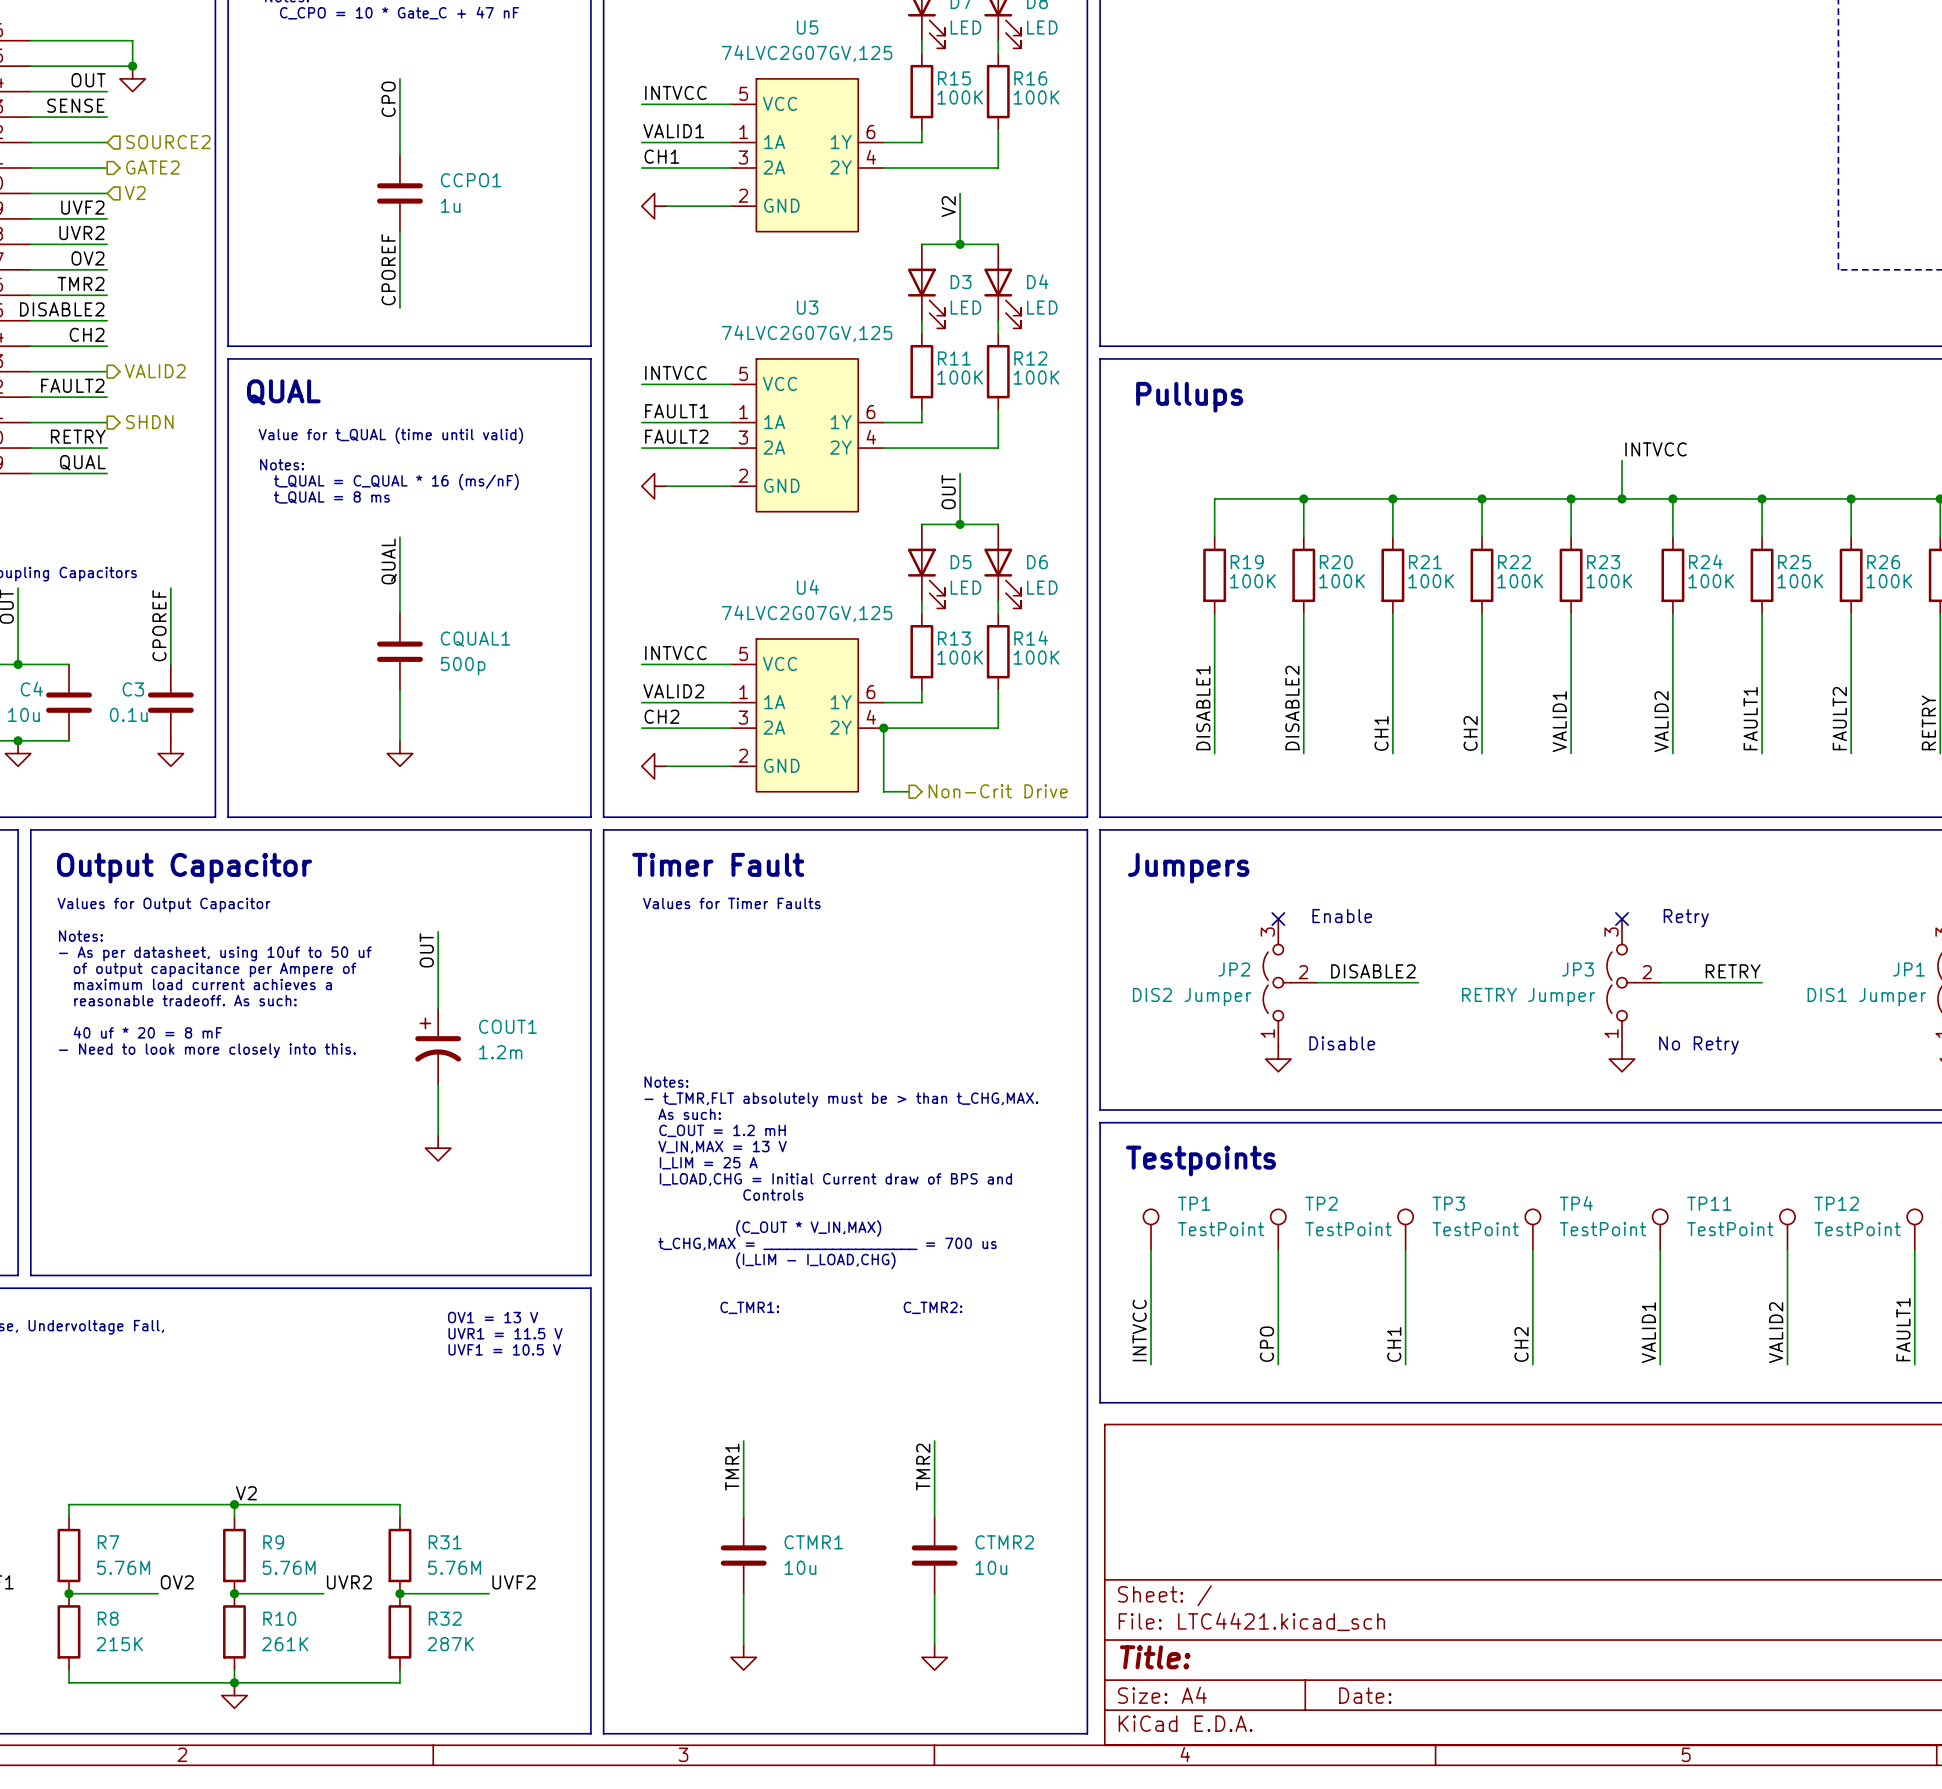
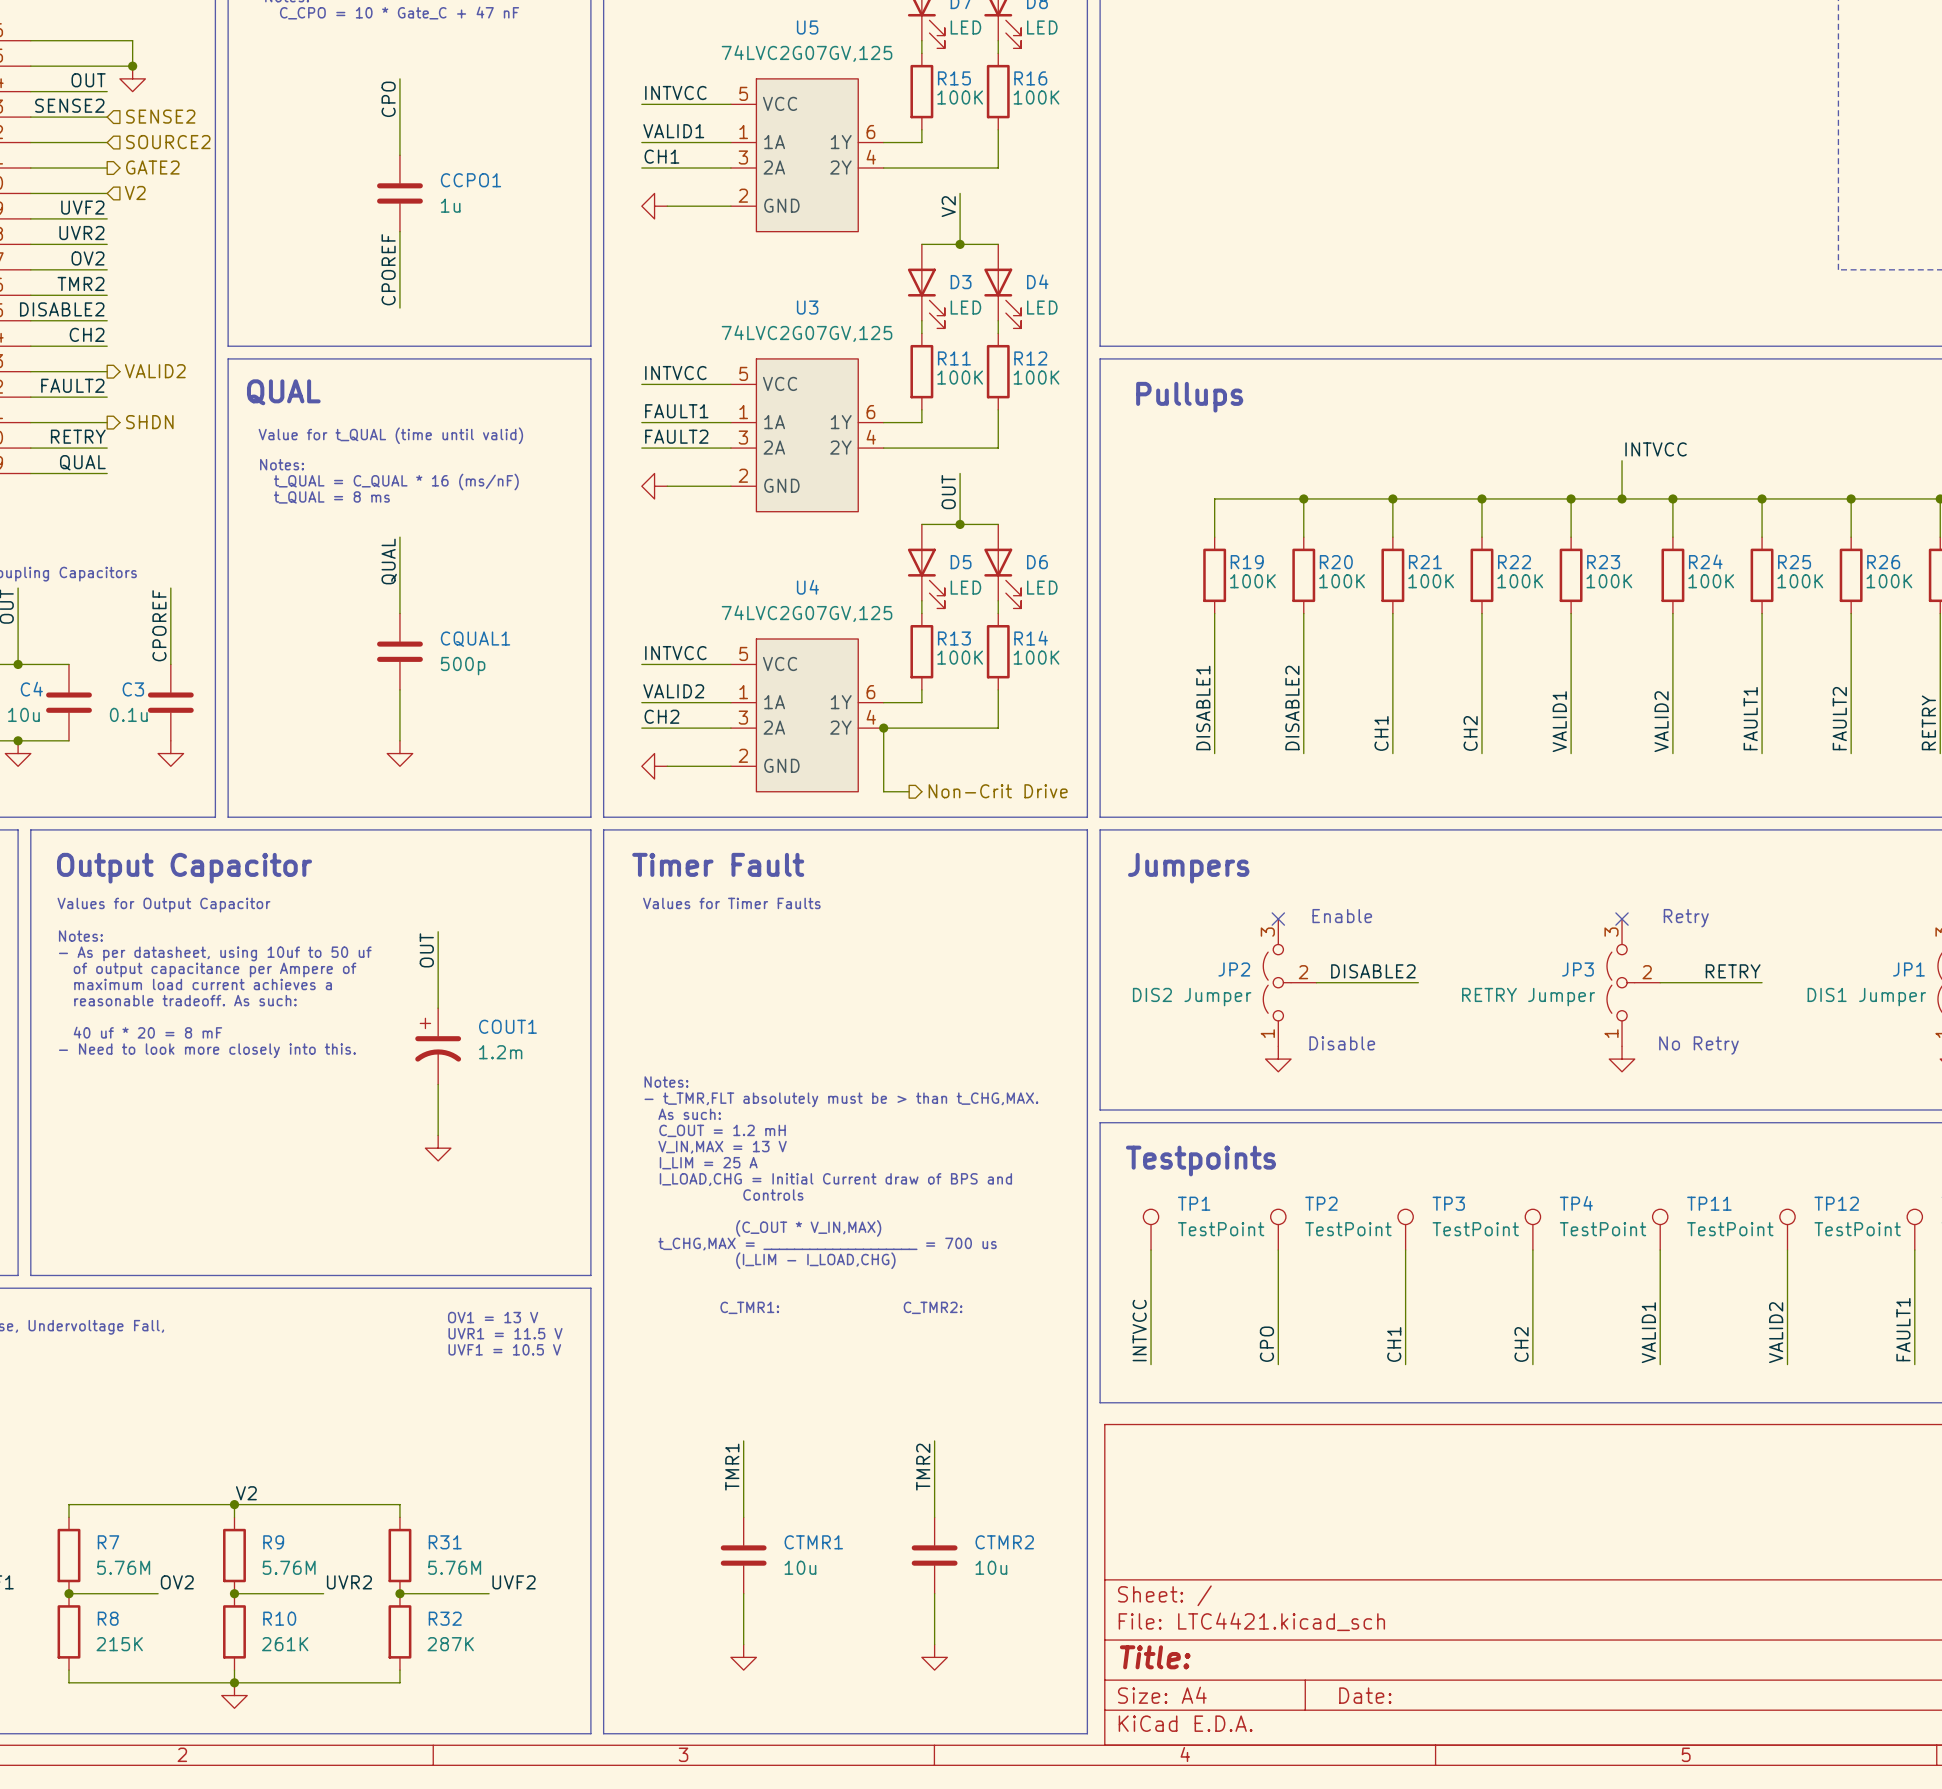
label: SENSE (75, 105) -> SENSE2 (69, 105)
hierarchical label: none -> SENSE2 (160, 116)

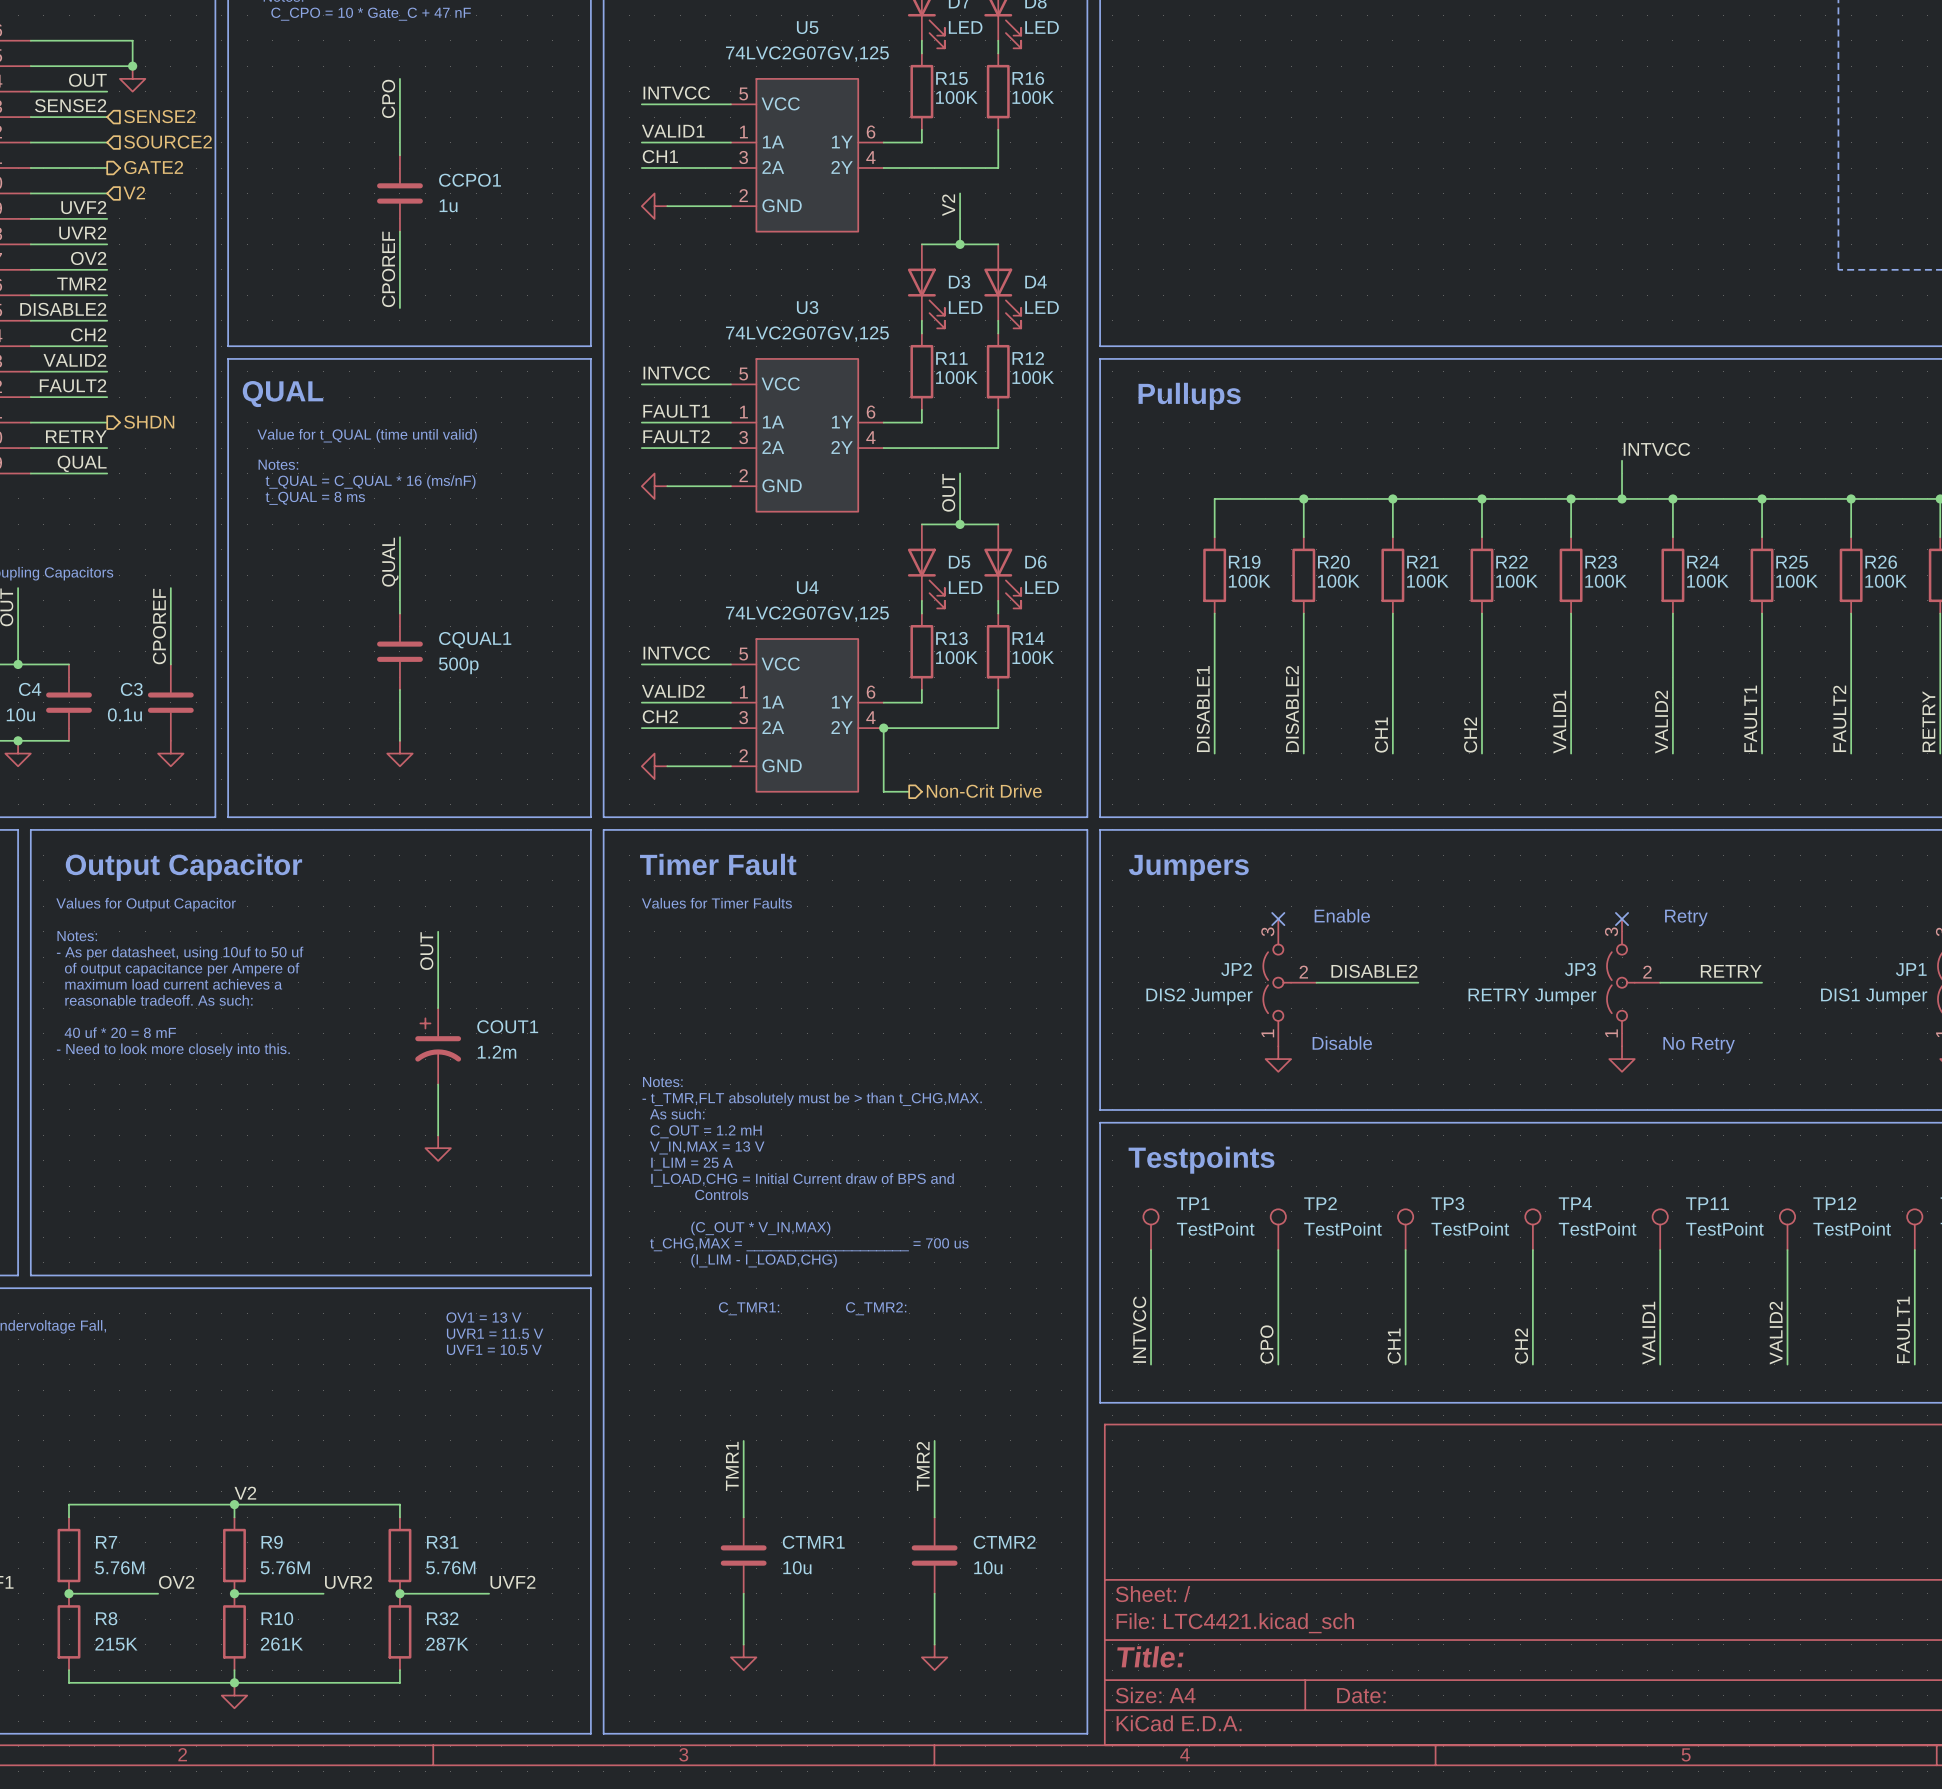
label: none -> VALID2 (74, 360)
hierarchical label: VALID2 (155, 371) -> none

